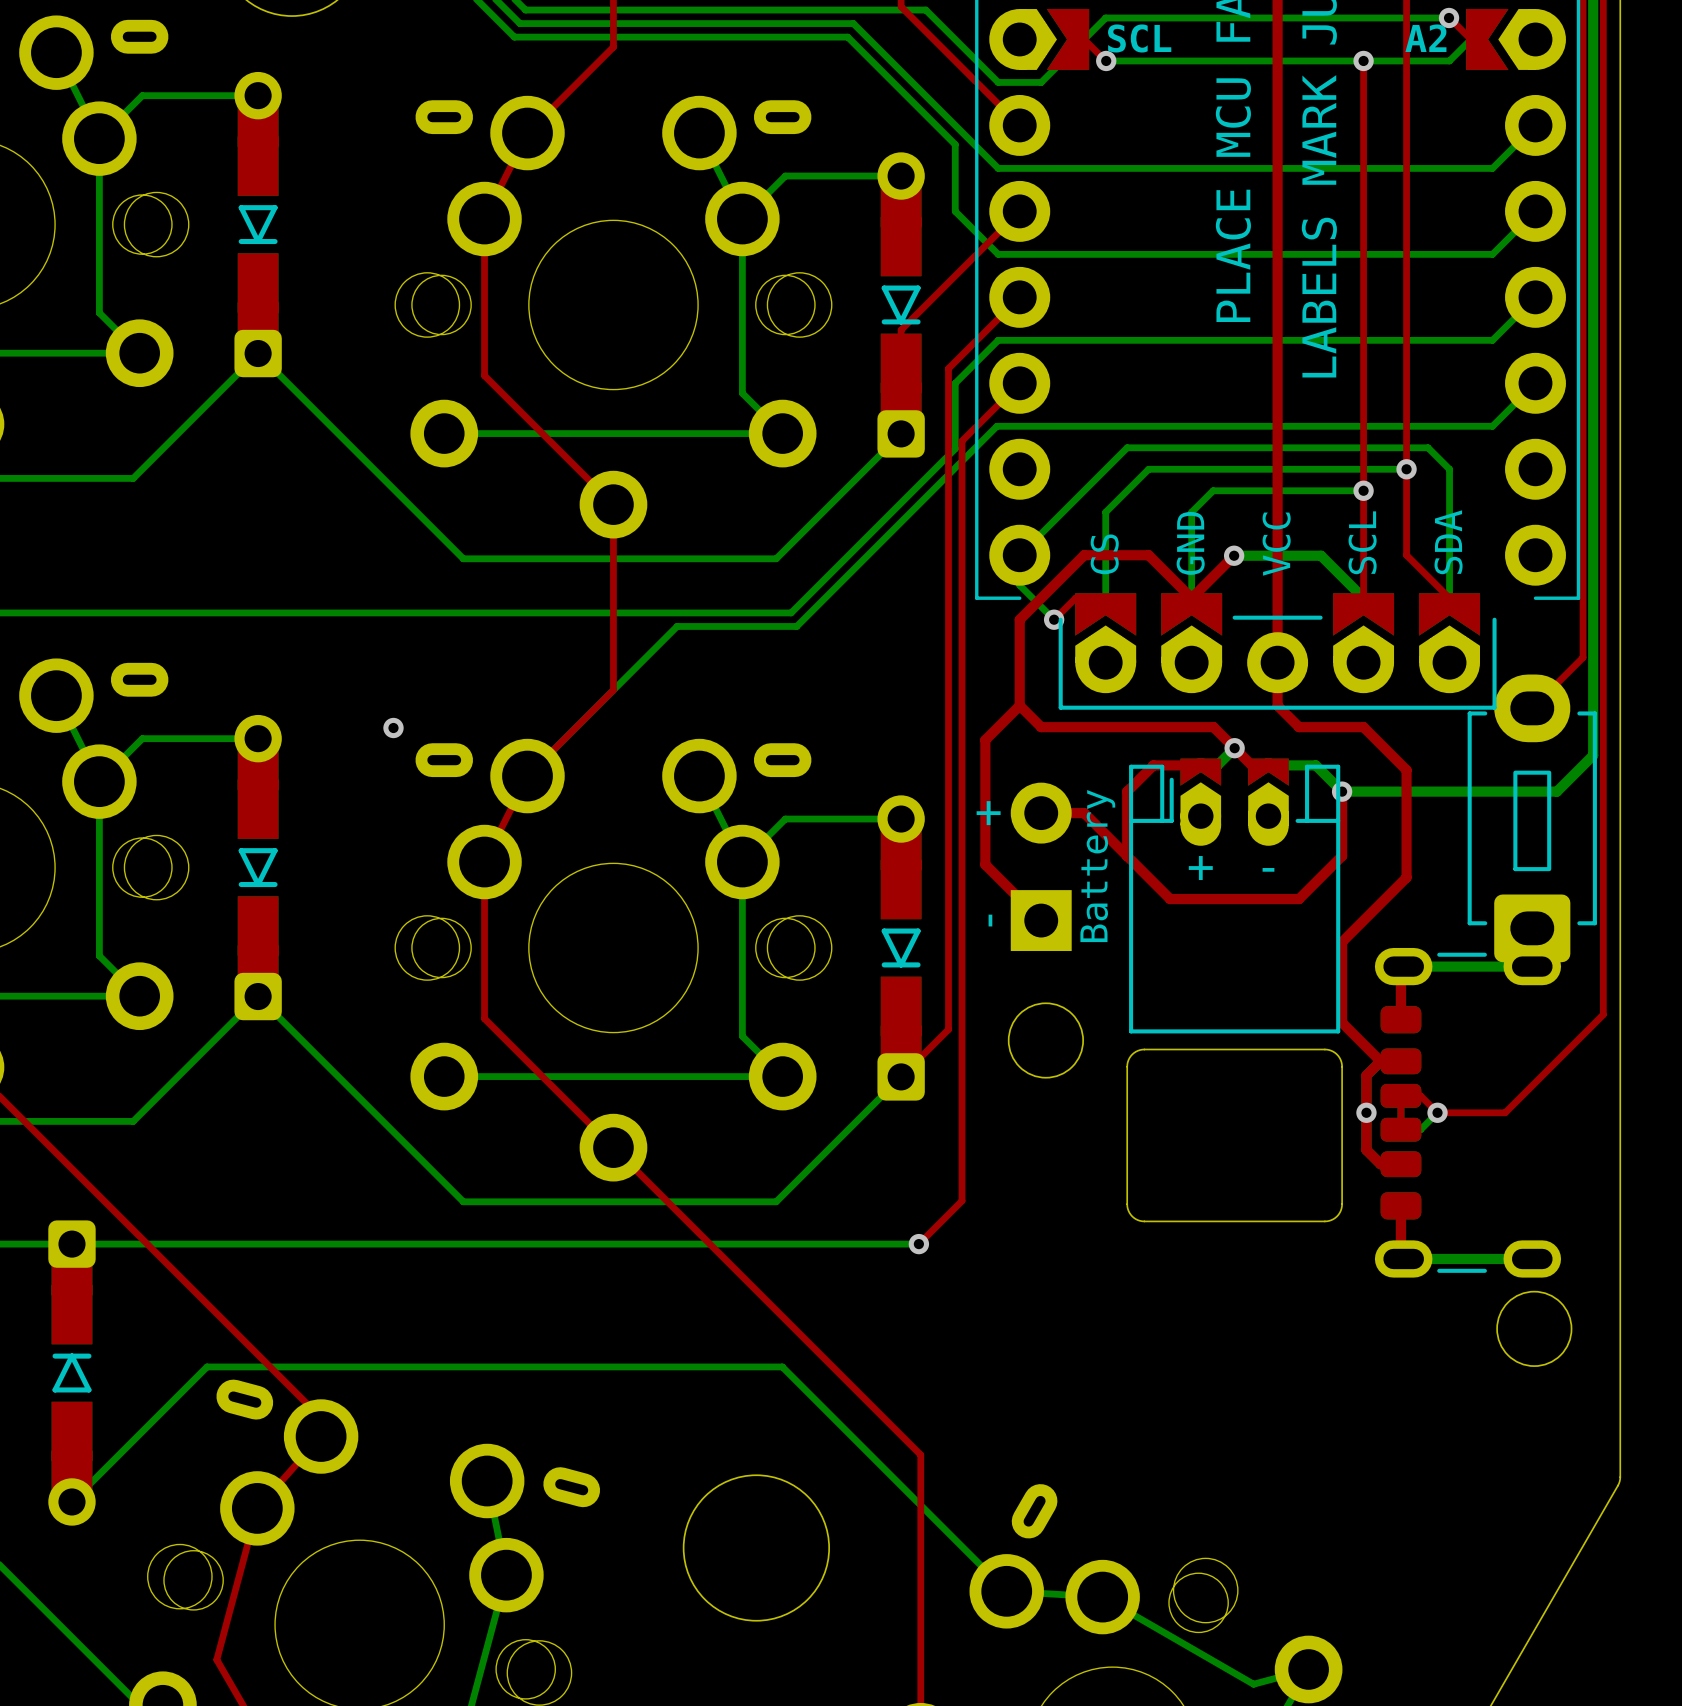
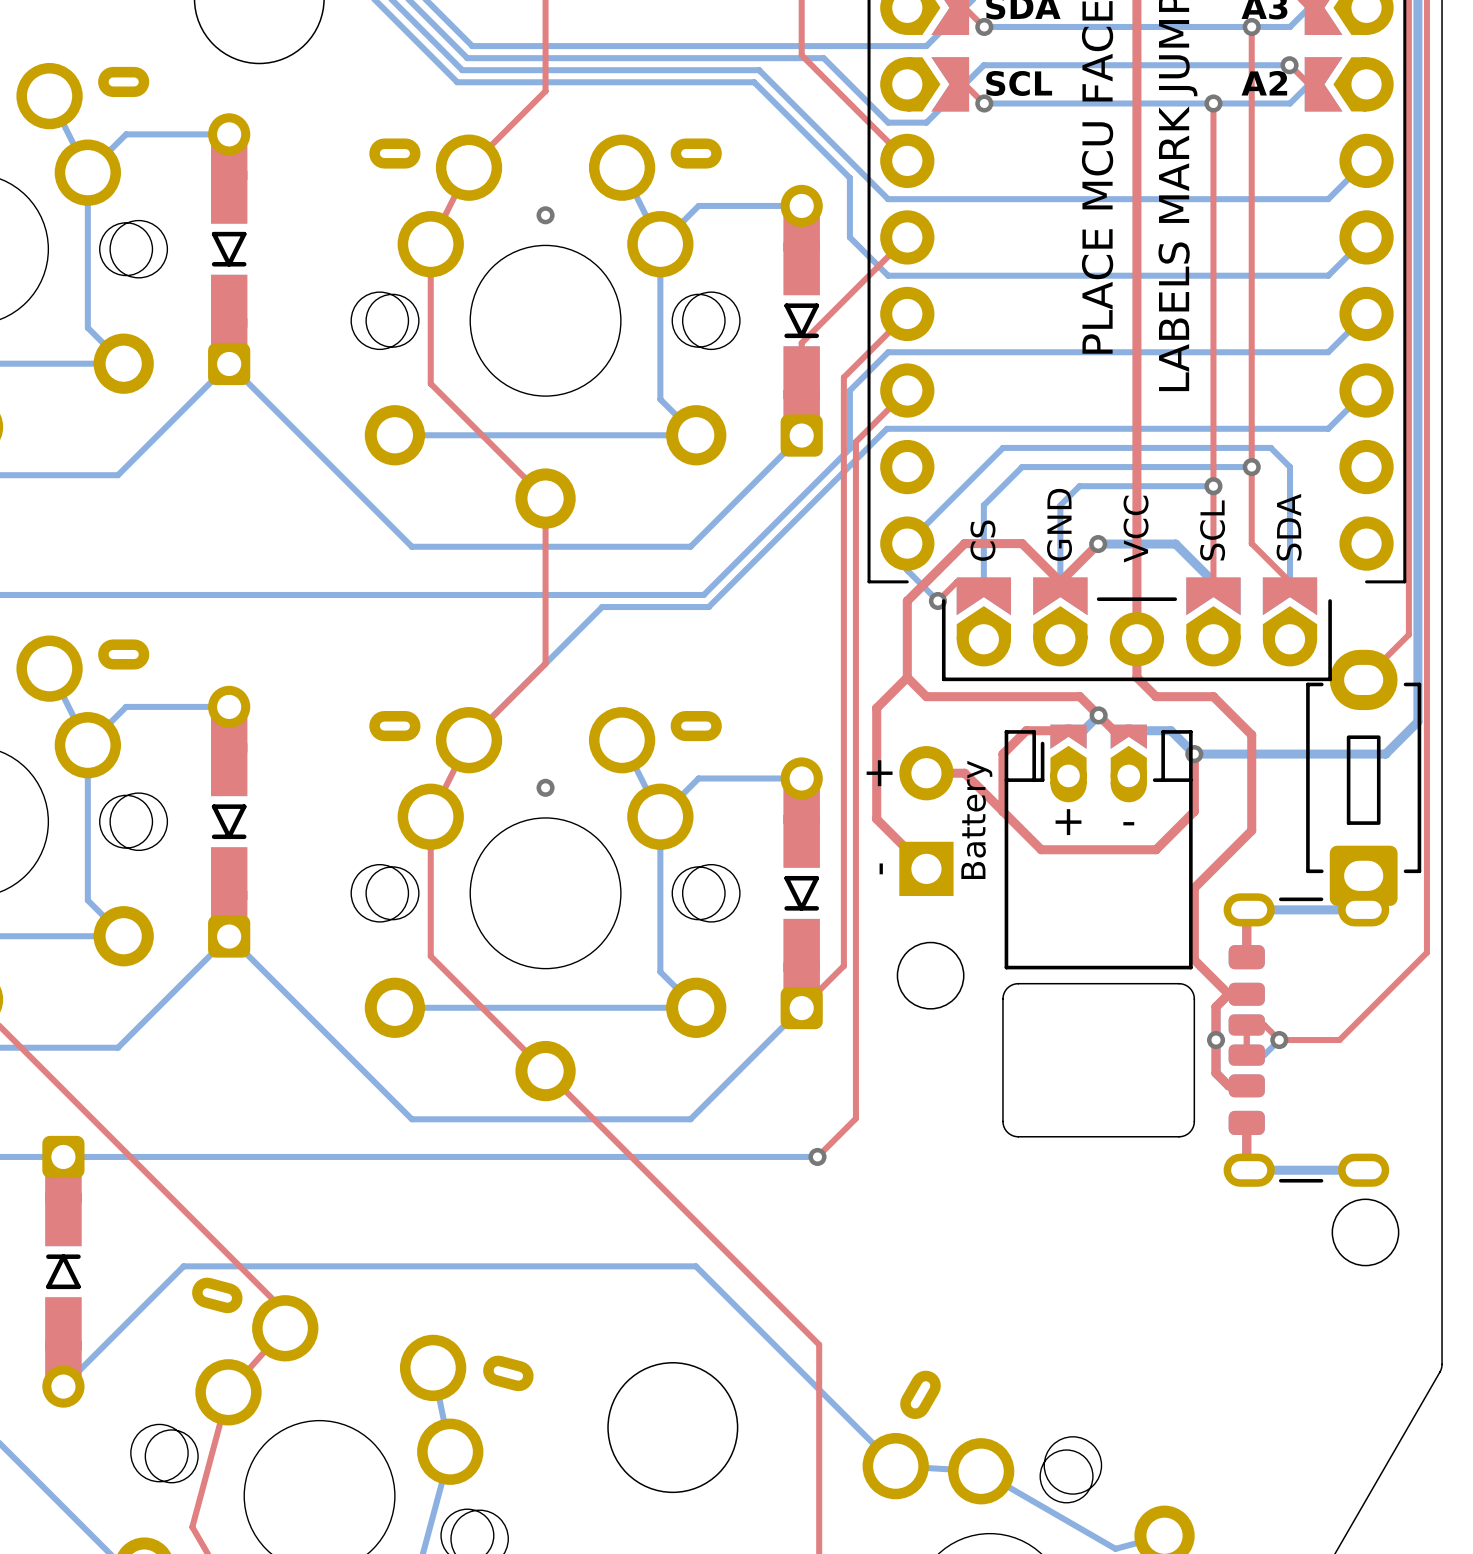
via: none -> (545, 215)
via: (393, 728) -> none
via: none -> (545, 787)

